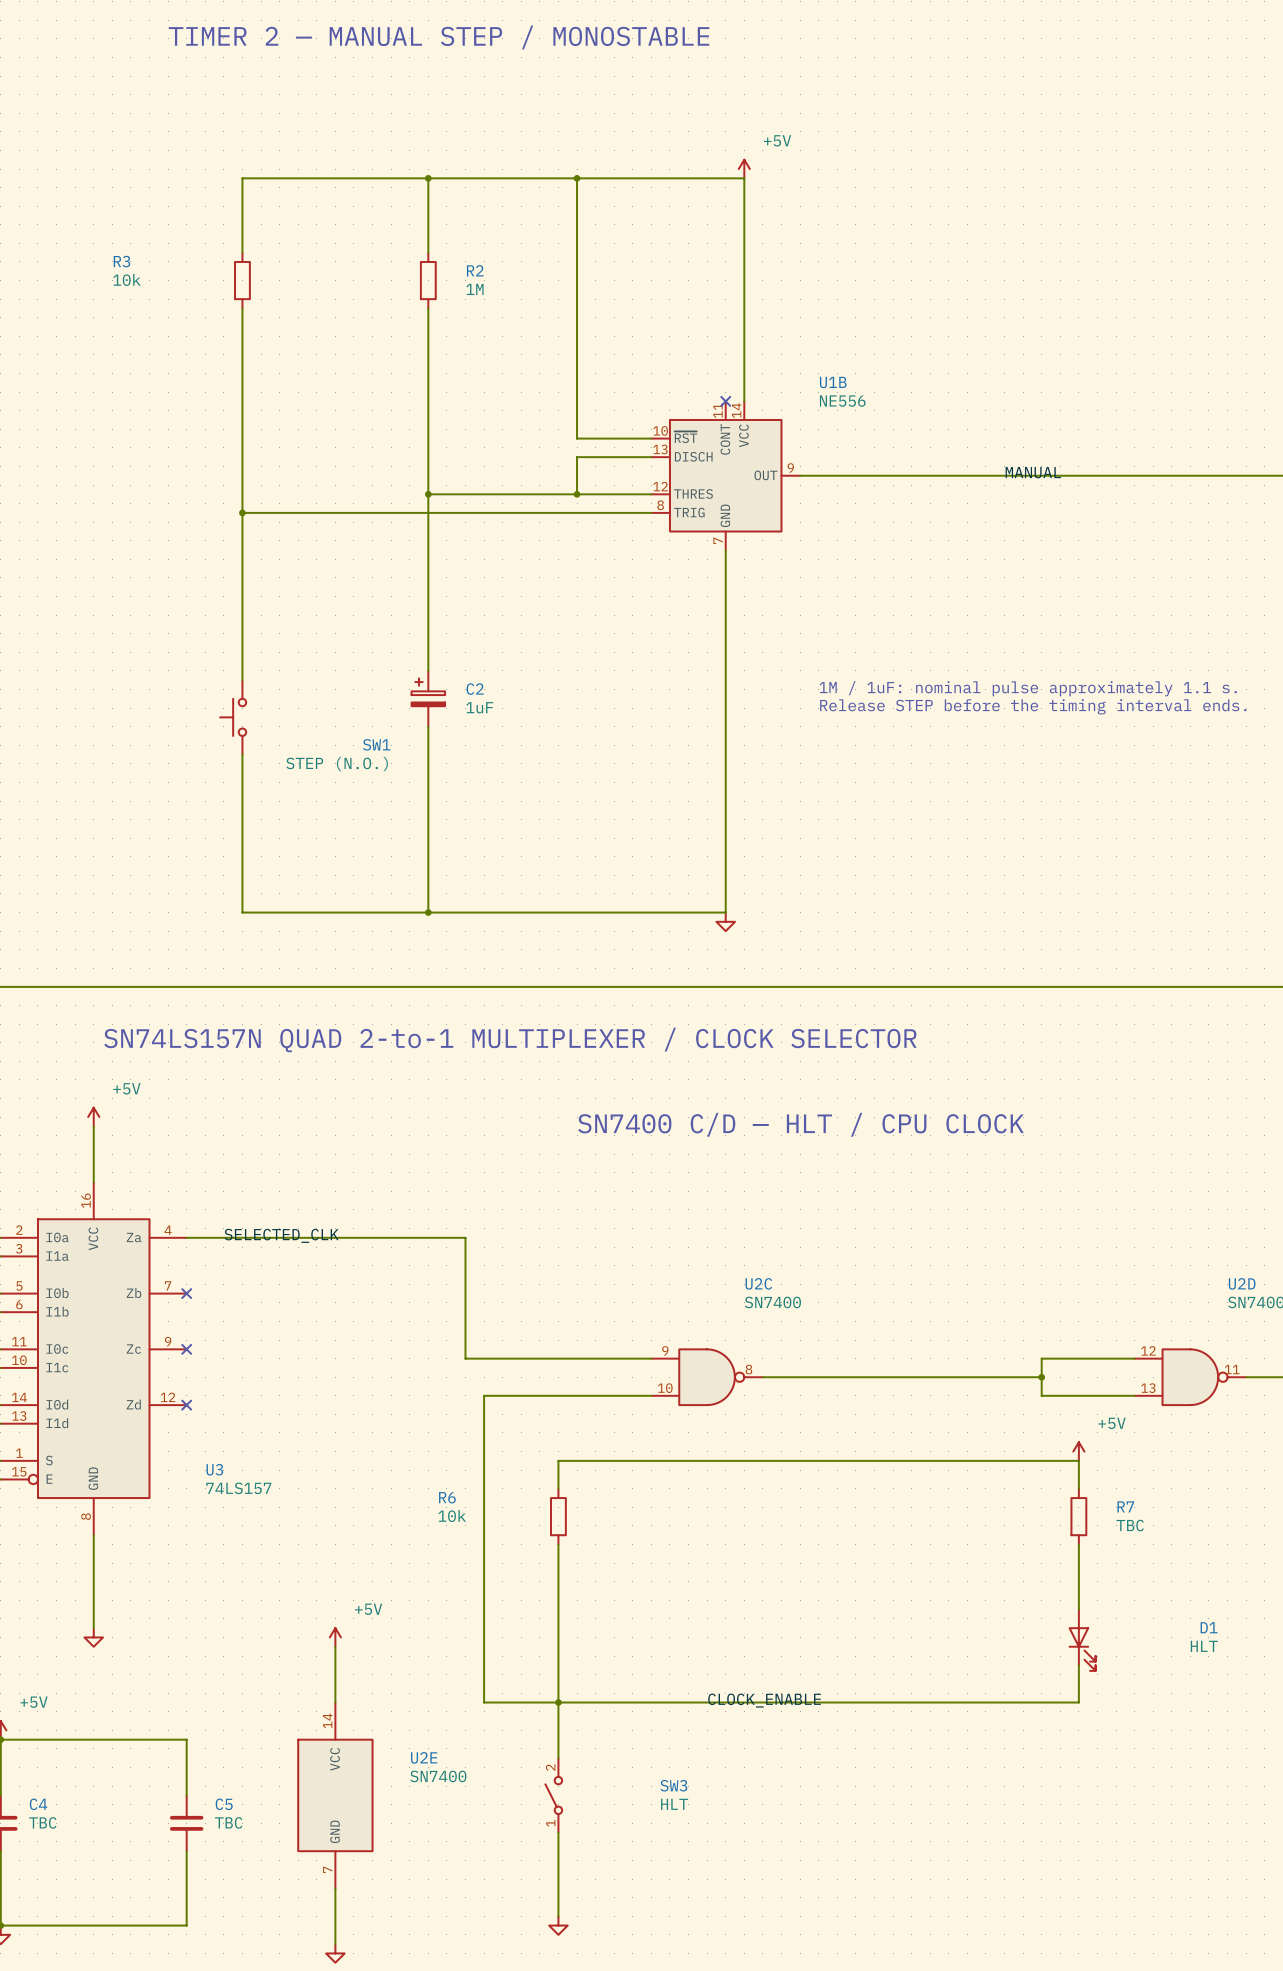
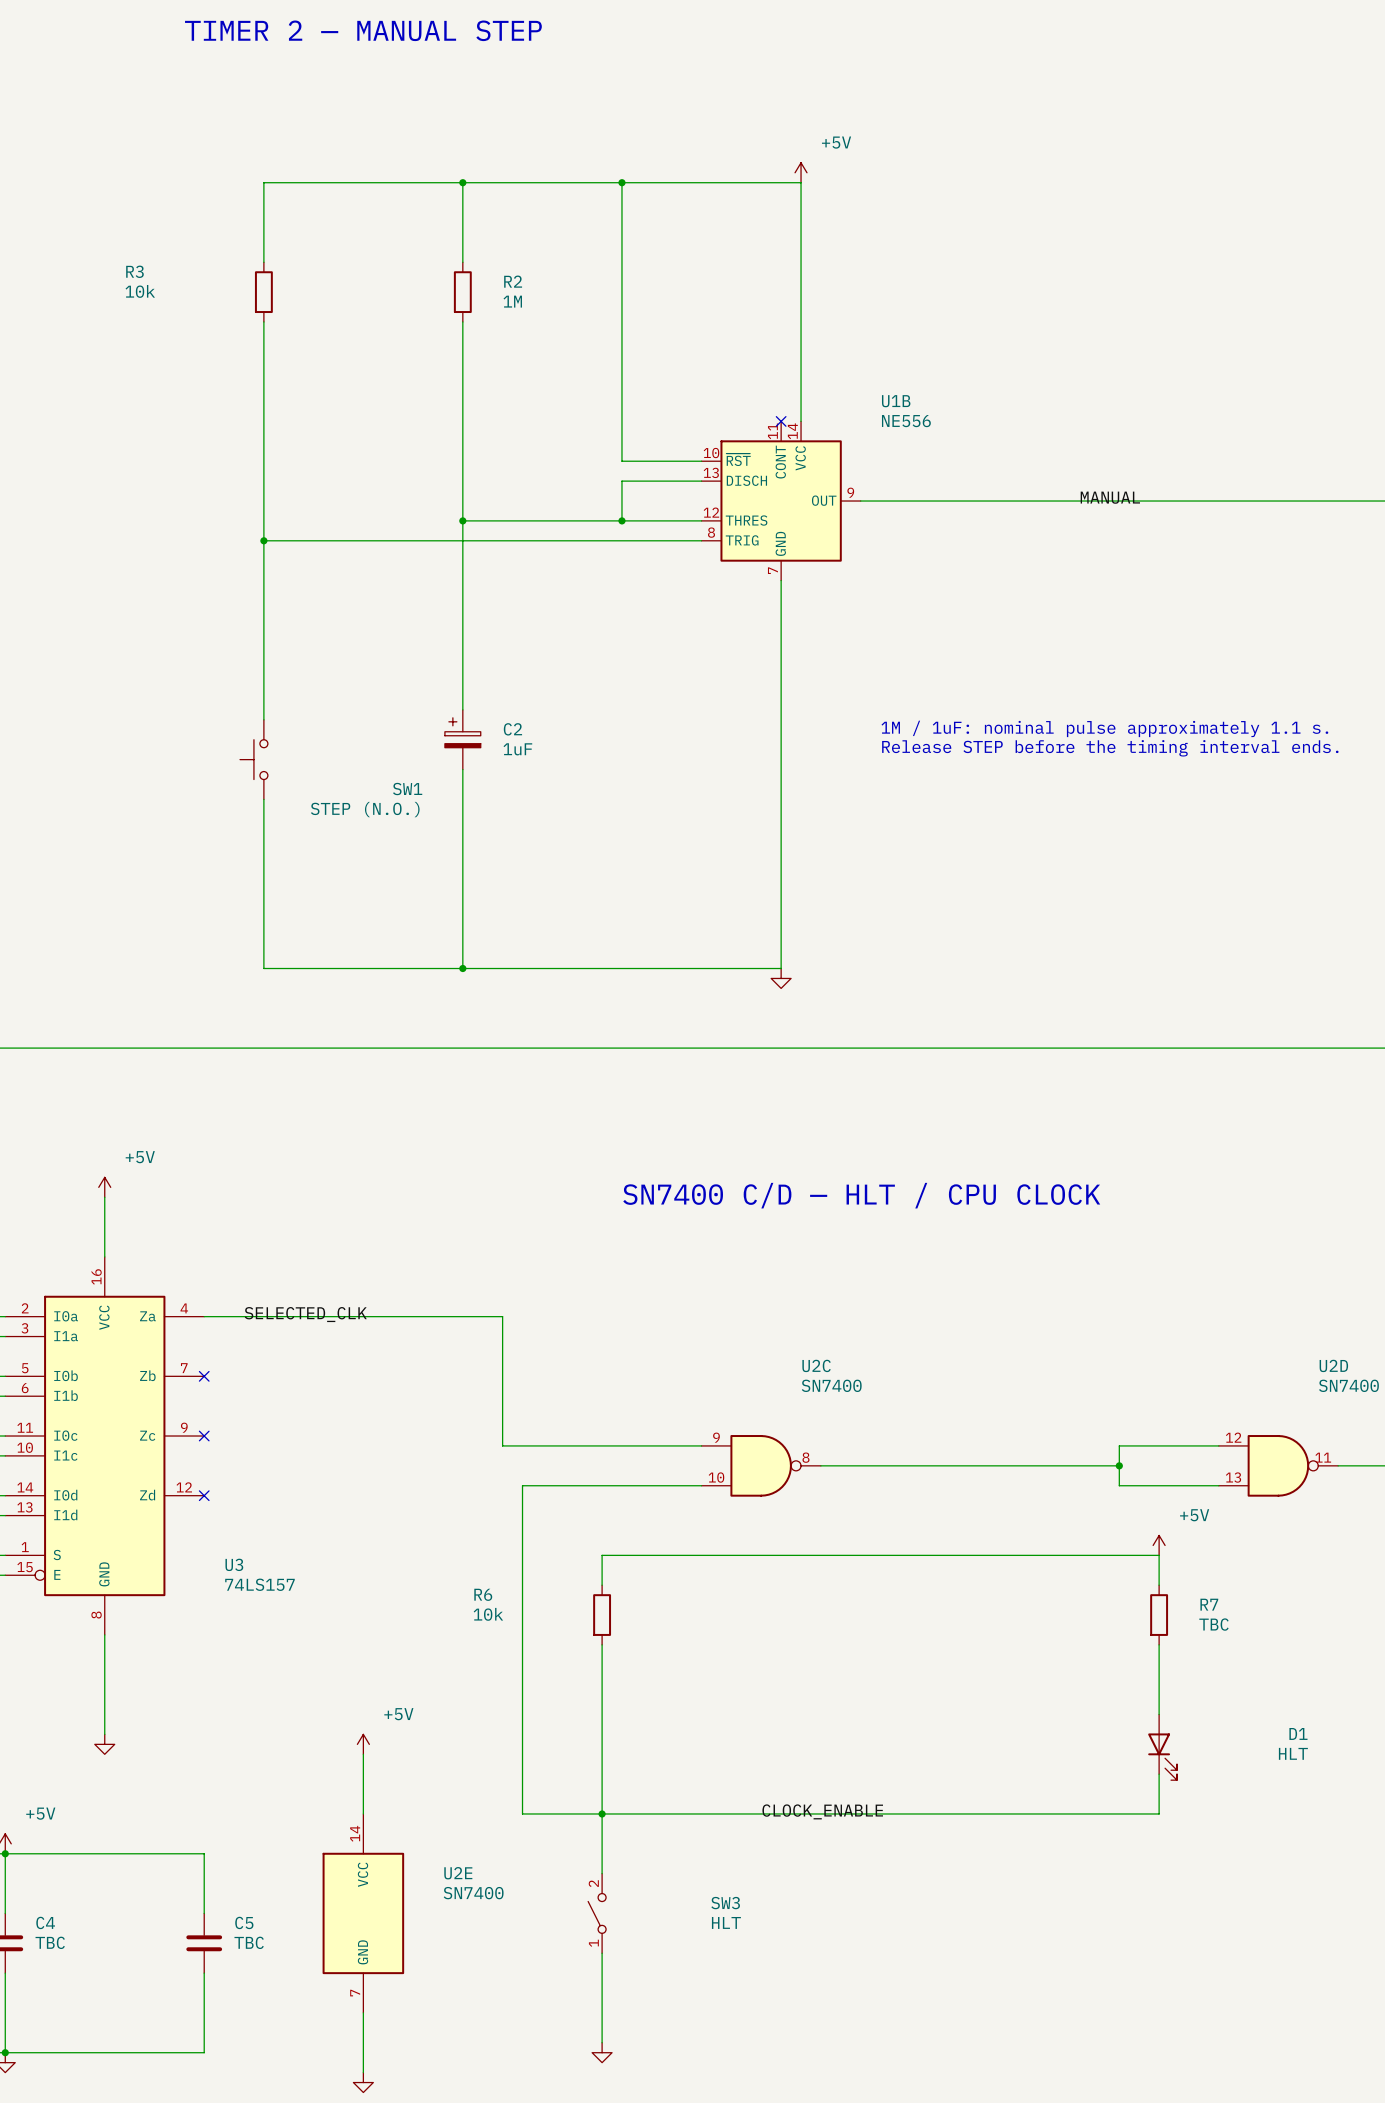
text: TIMER 2 — MANUAL STEP / MONOSTABLE (439, 37) -> TIMER 2 — MANUAL STEP (363, 30)
text: SN74LS157N QUAD 2-to-1 MULTIPLEXER / CLOCK SELECTOR (510, 1039) -> none

